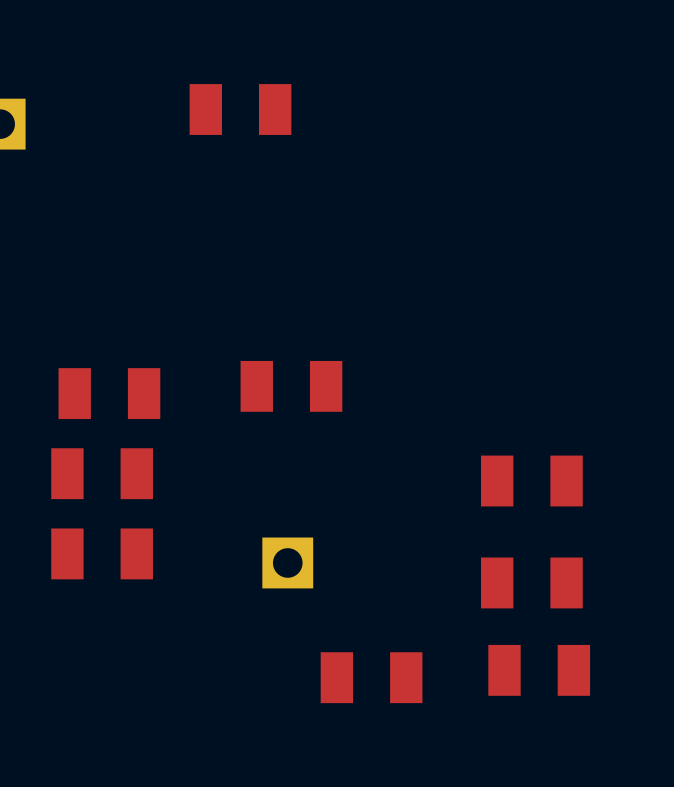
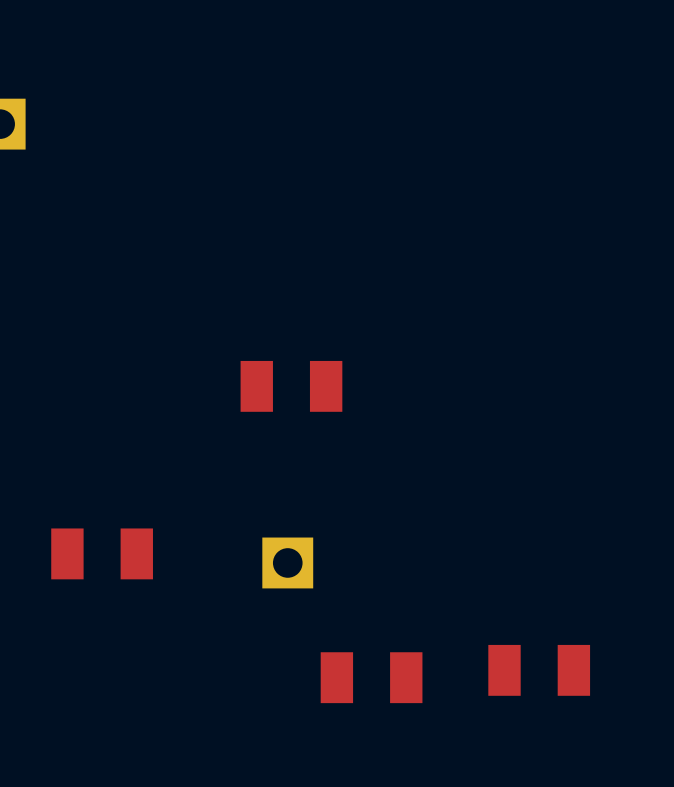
part: (240, 109) -> none
part: (109, 393) -> none
part: (102, 473) -> none
part: (531, 481) -> none
part: (531, 582) -> none

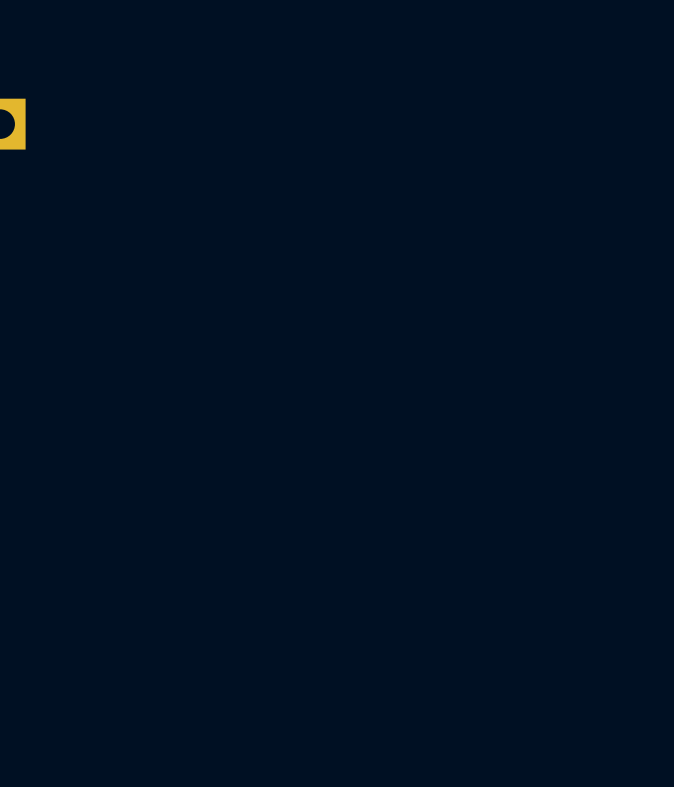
part: (291, 386) -> none
part: (102, 553) -> none
part: (287, 562) -> none
part: (539, 670) -> none
part: (371, 677) -> none

